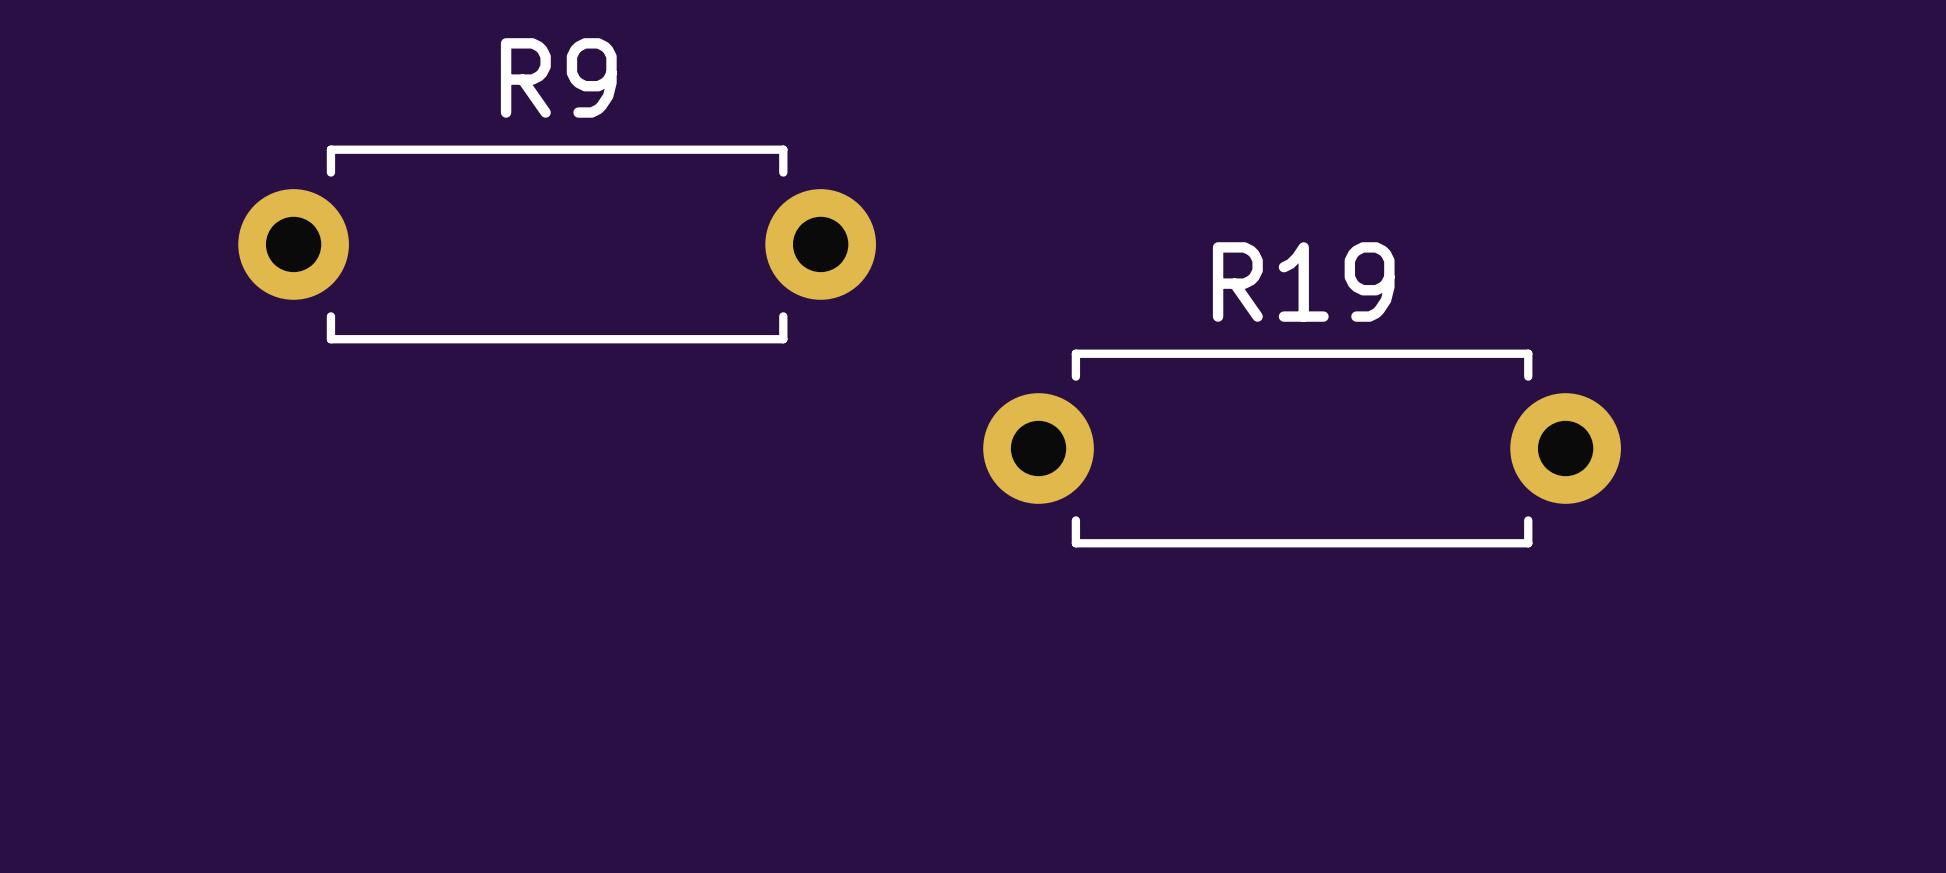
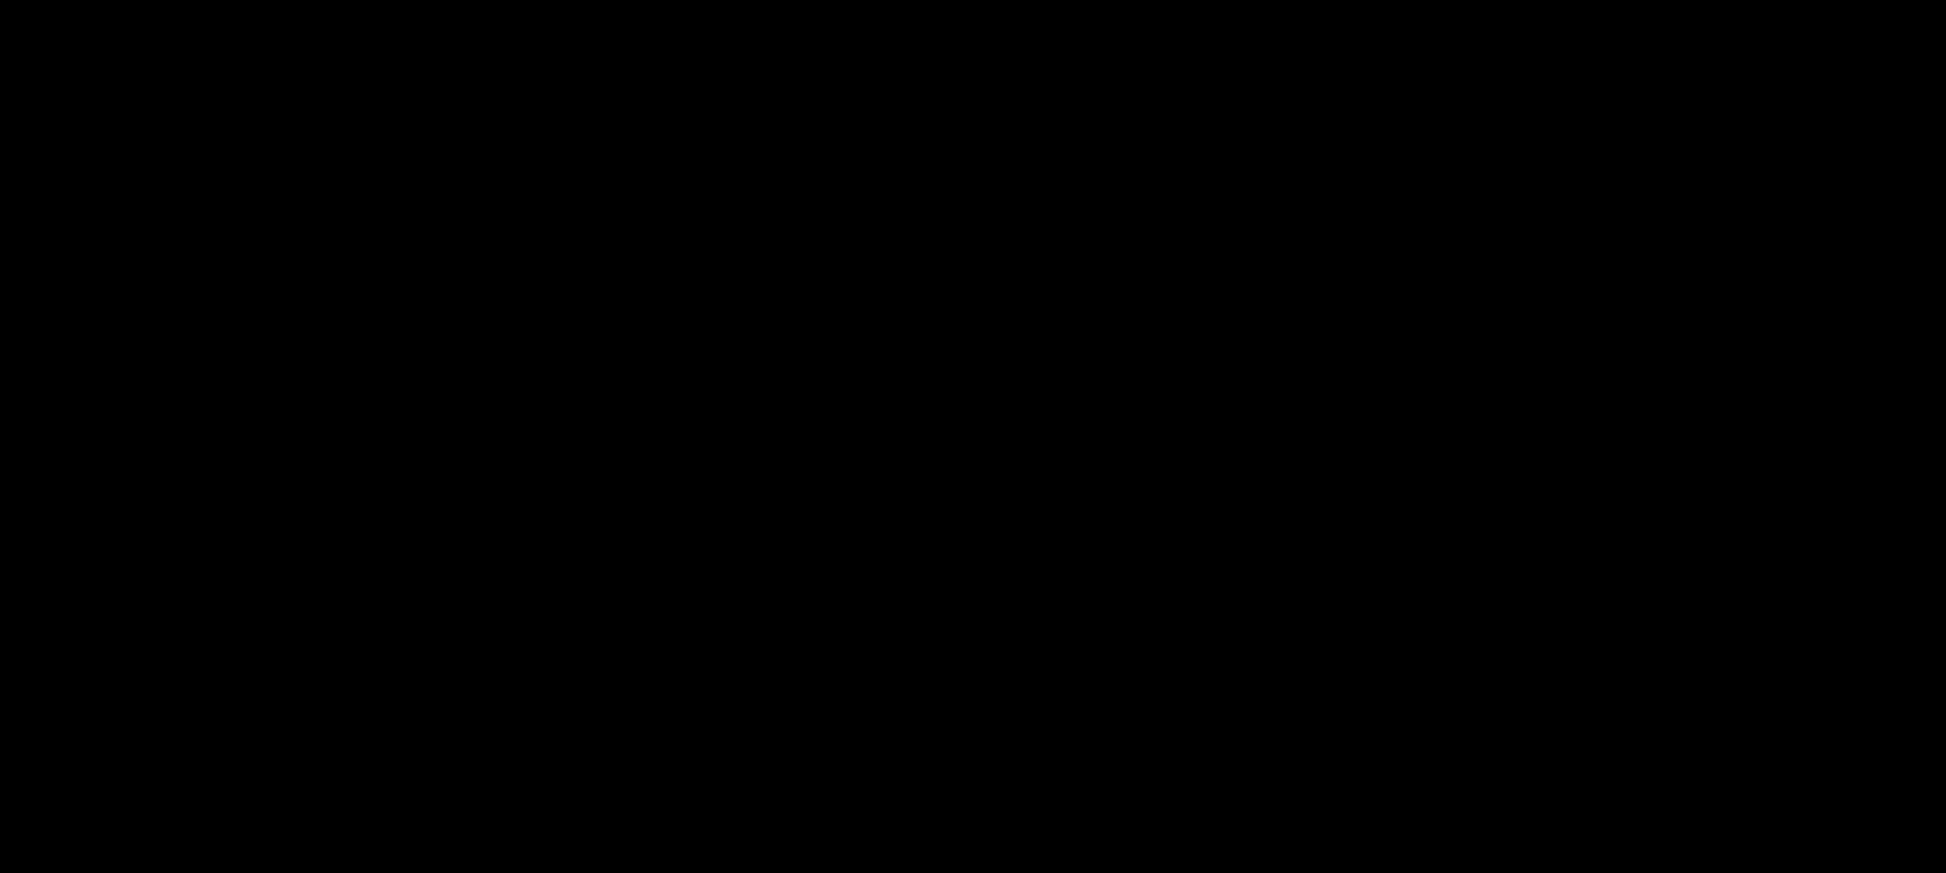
R9: (557, 244) -> none
R19: (1302, 448) -> none

